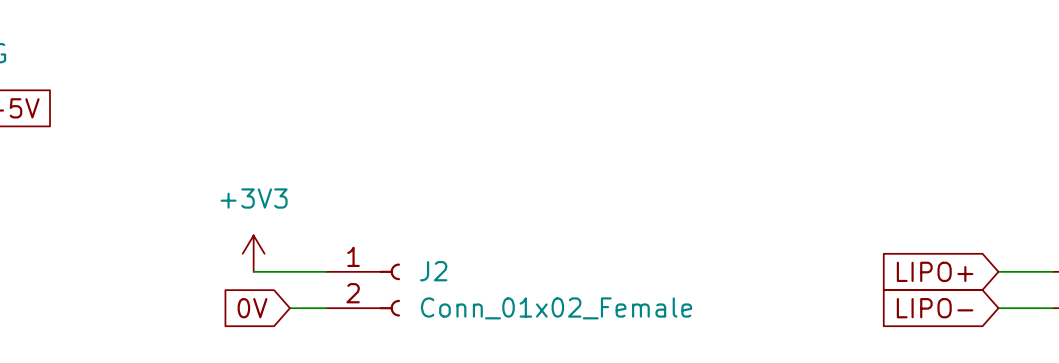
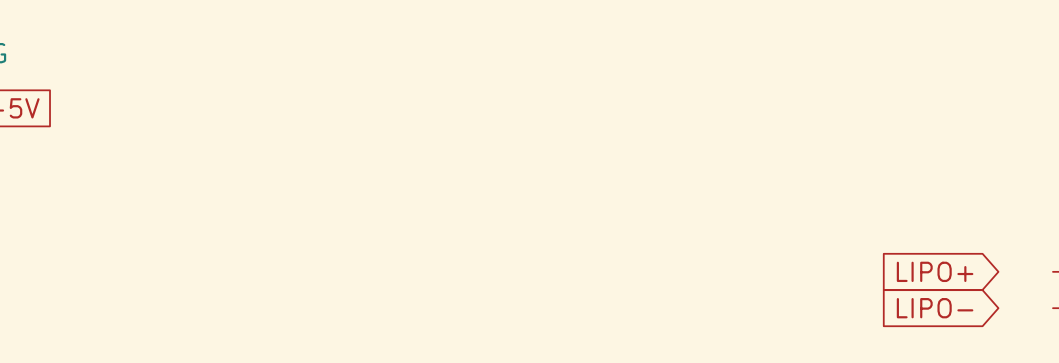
power symbol: +3V3 (253, 253) -> none
wire: (253, 271) (326, 271) -> none
wire: (998, 271) (1052, 271) -> none
J2: Conn_01x02_Female (363, 290) -> none
global label: 0V (252, 308) -> none
wire: (289, 308) (326, 308) -> none
wire: (998, 308) (1052, 308) -> none

